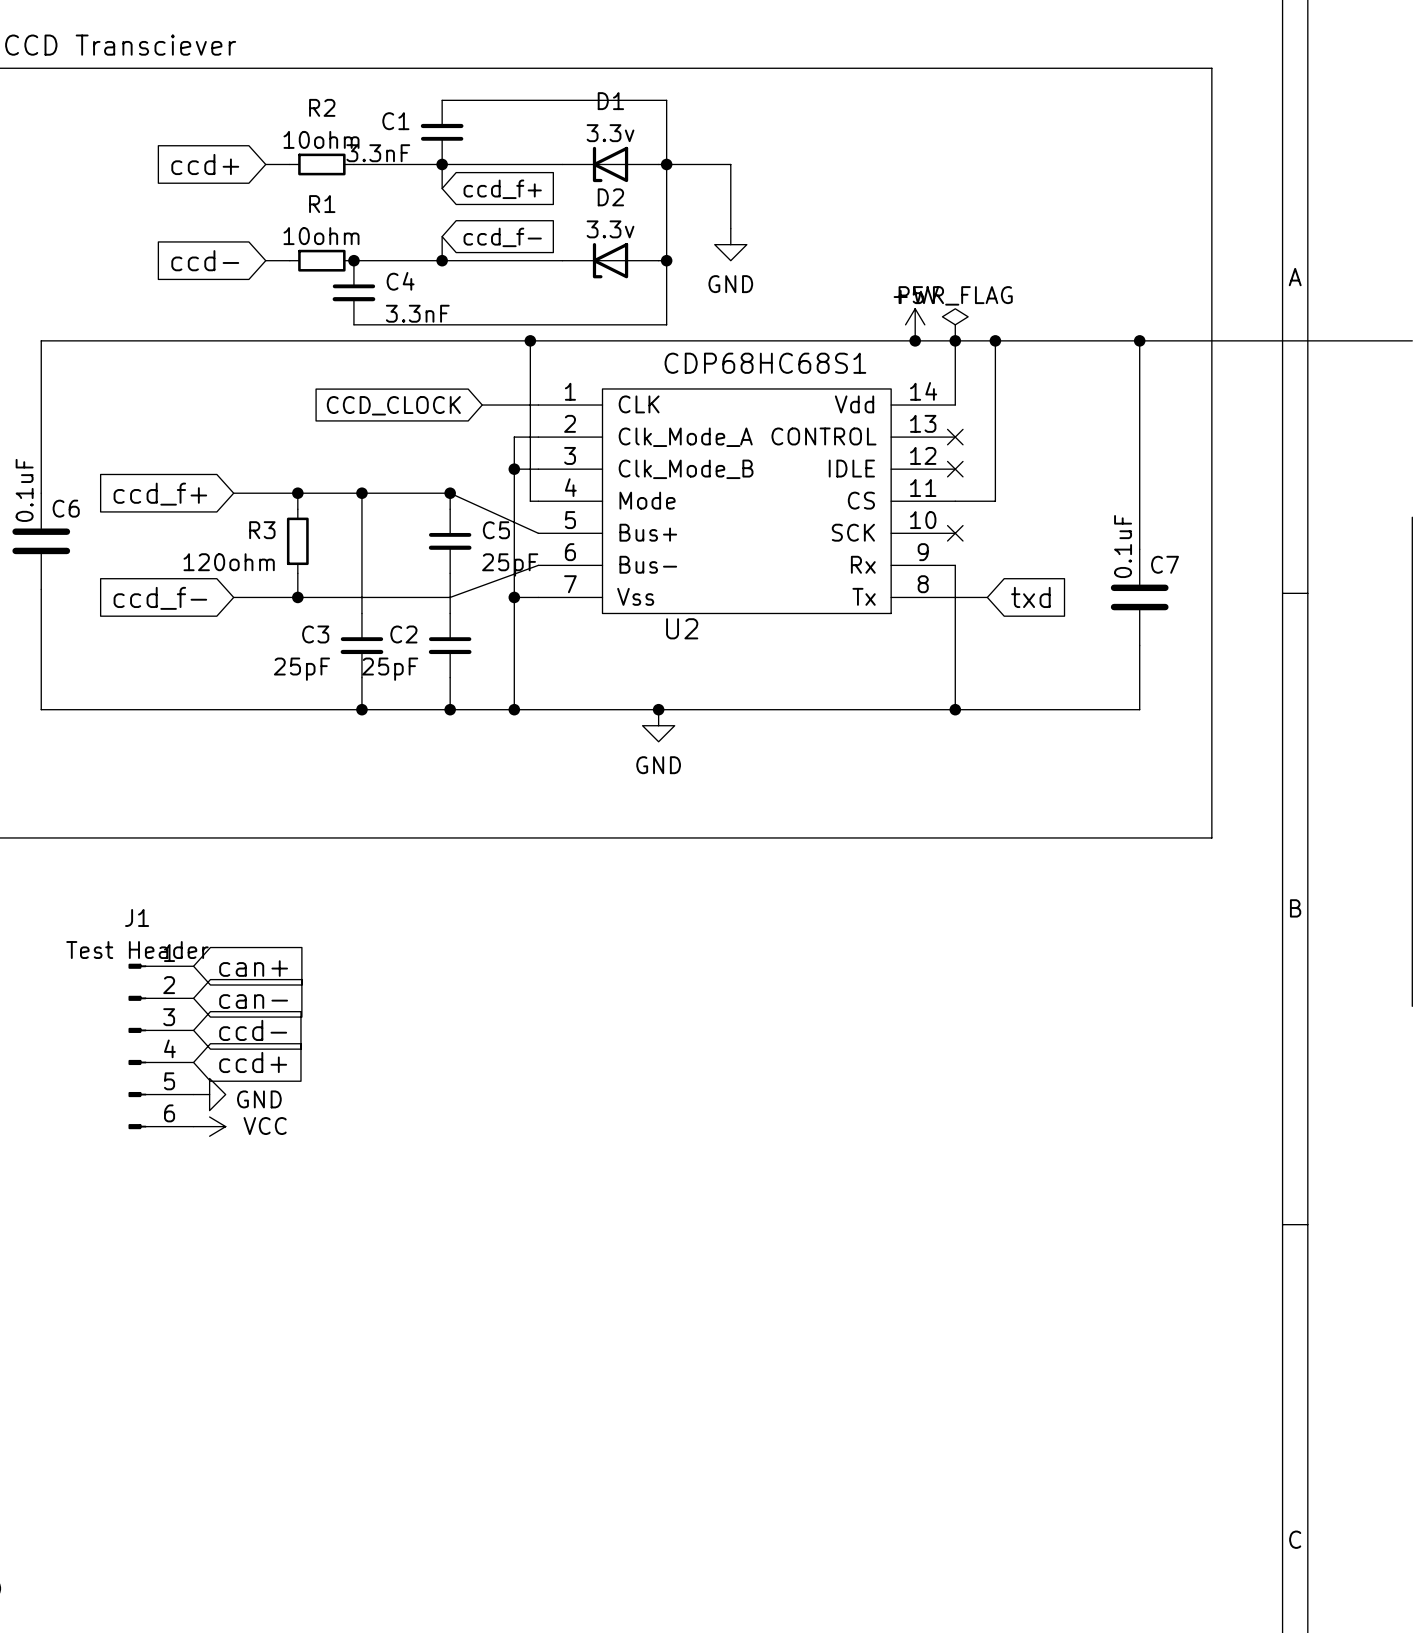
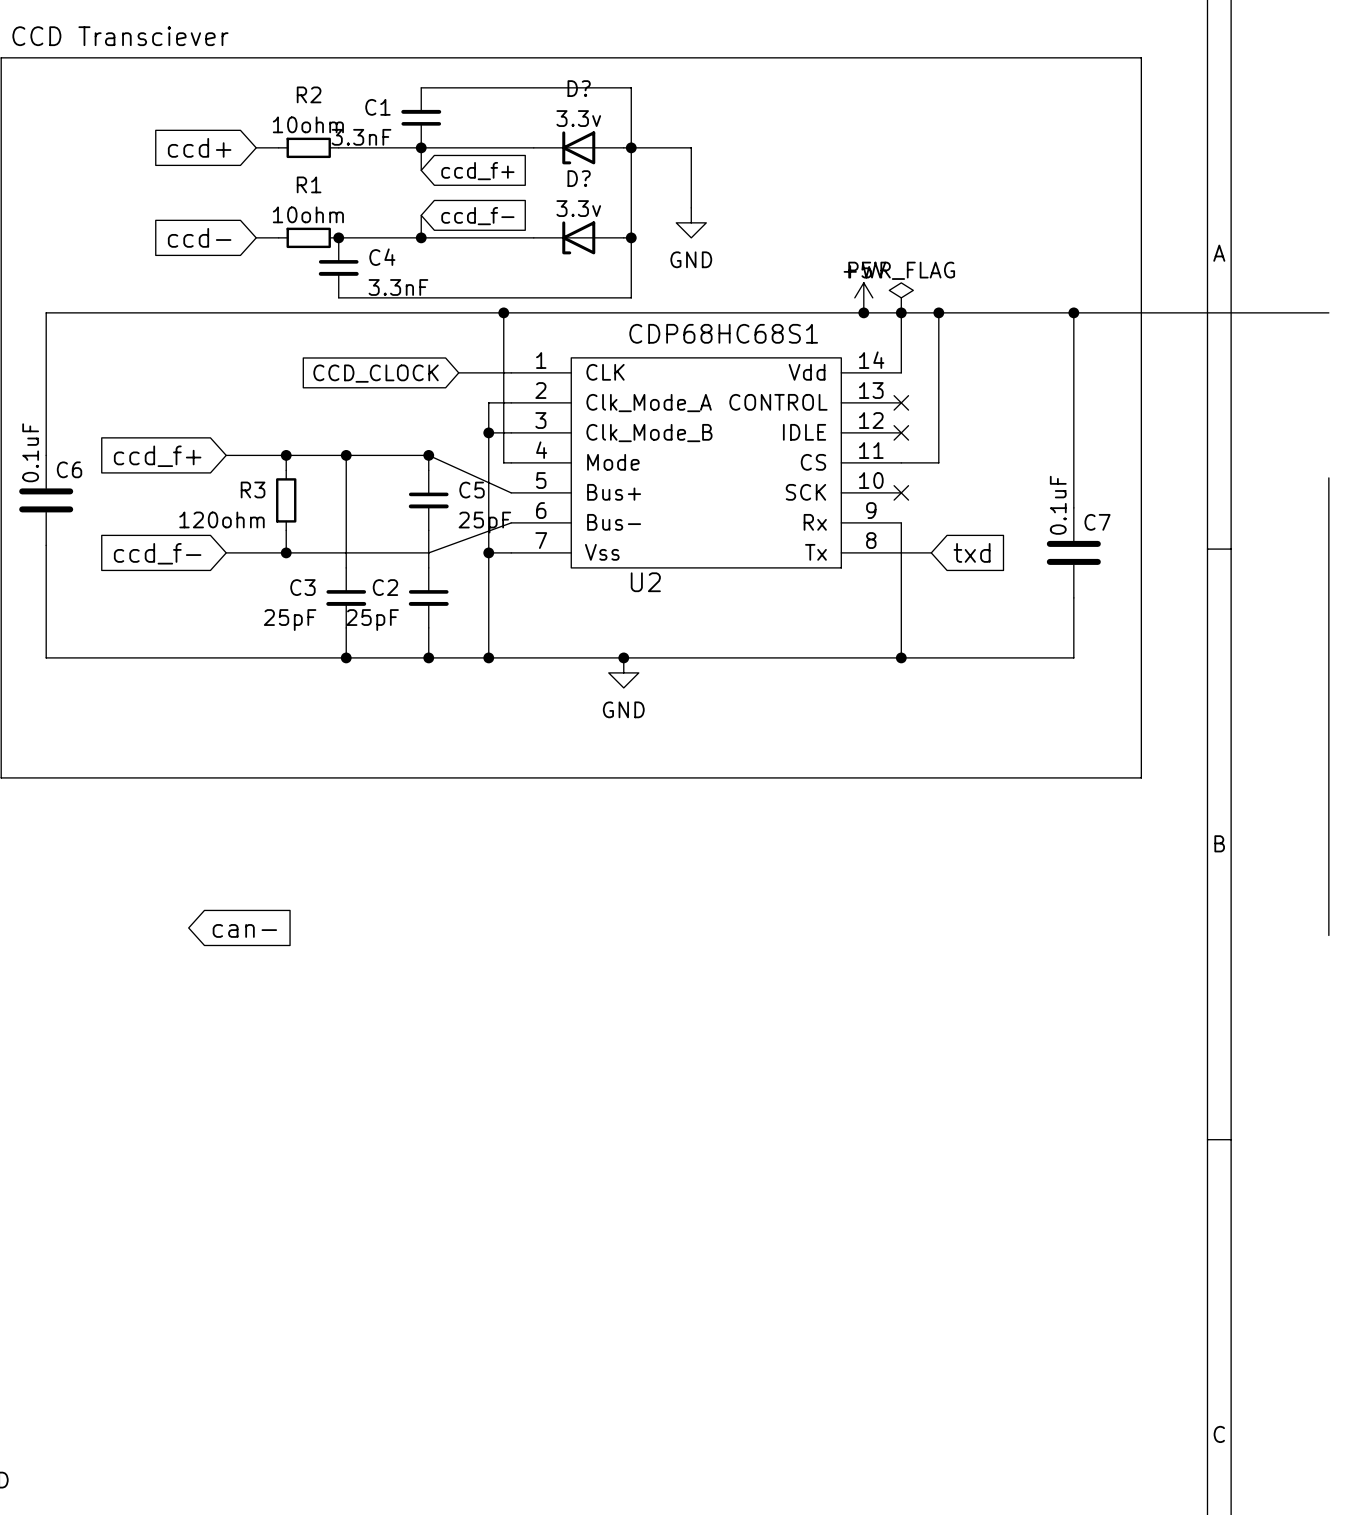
D1 name: D1 (610, 101) -> D? (579, 88)
D2 name: D2 (610, 197) -> D? (579, 178)
global label: can+ (253, 968) -> none
global label: ccd- (253, 1030) -> none
J1: Test Header (161, 1046) -> none
global label: ccd+ (253, 1062) -> none
power symbol: GND (209, 1094) -> none
power symbol: VCC (209, 1126) -> none

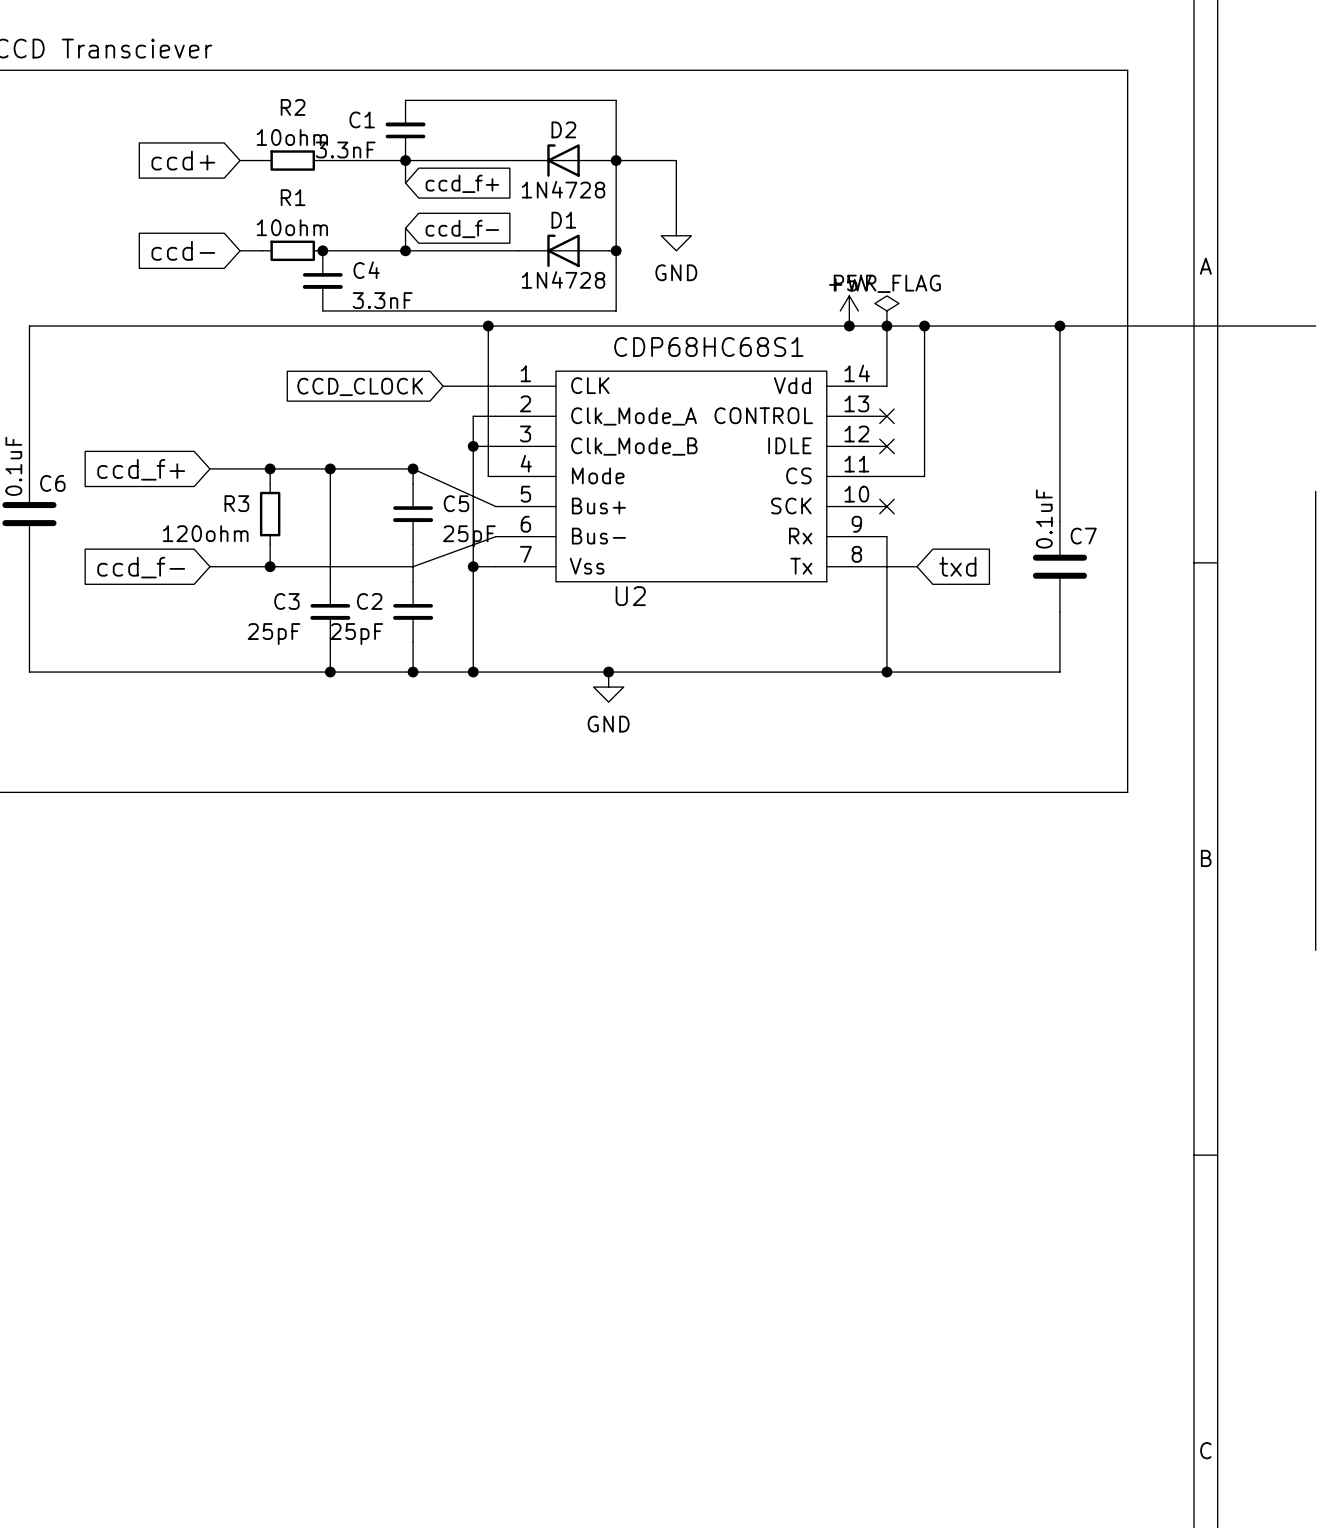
D?: 3.3v (578, 147) -> none
D2: none -> 1N4728 (563, 160)
D?: 3.3v (578, 237) -> none
D1: none -> 1N4728 (563, 250)
global label: can- (244, 930) -> none

